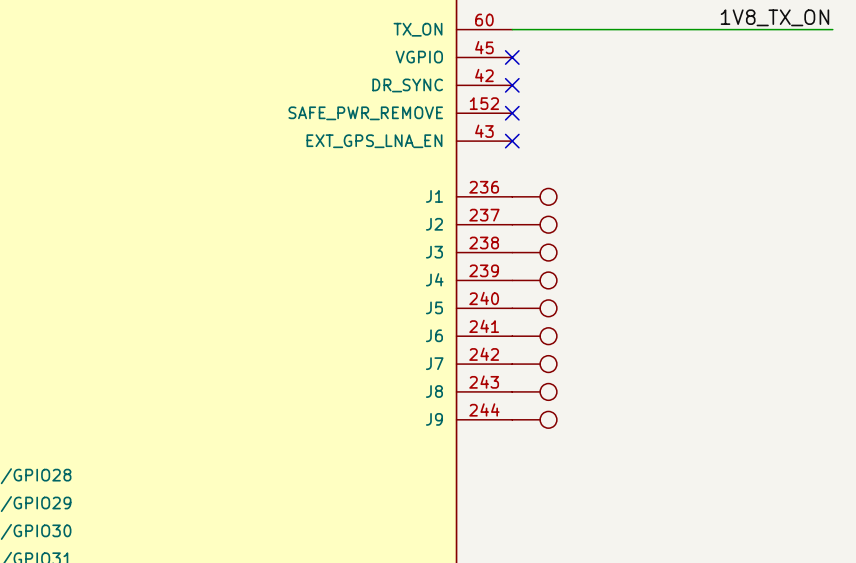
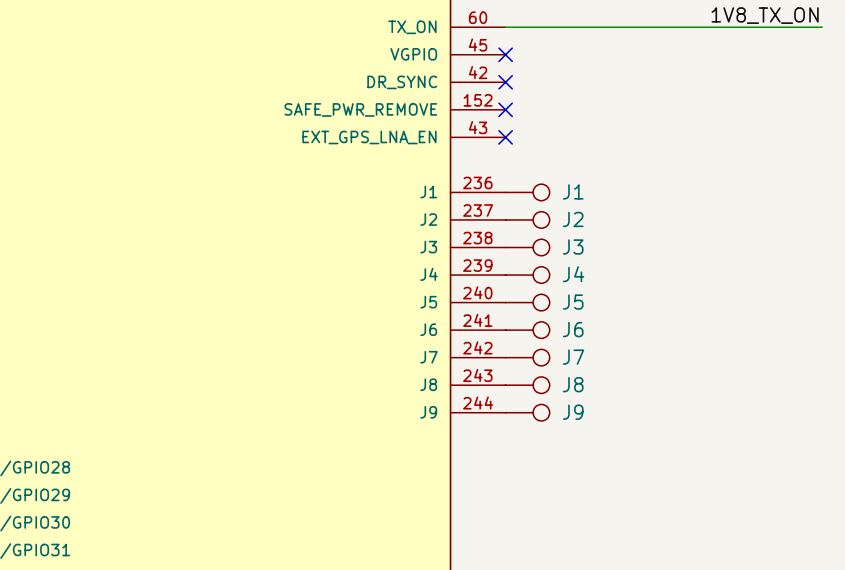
J1 name: none -> J1 (573, 191)
J2 name: none -> J2 (573, 219)
J3 name: none -> J3 (573, 246)
J4 name: none -> J4 (573, 274)
J5 name: none -> J5 (573, 302)
J6 name: none -> J6 (573, 329)
J7 name: none -> J7 (573, 357)
J8 name: none -> J8 (573, 384)
J9 name: none -> J9 (573, 412)

